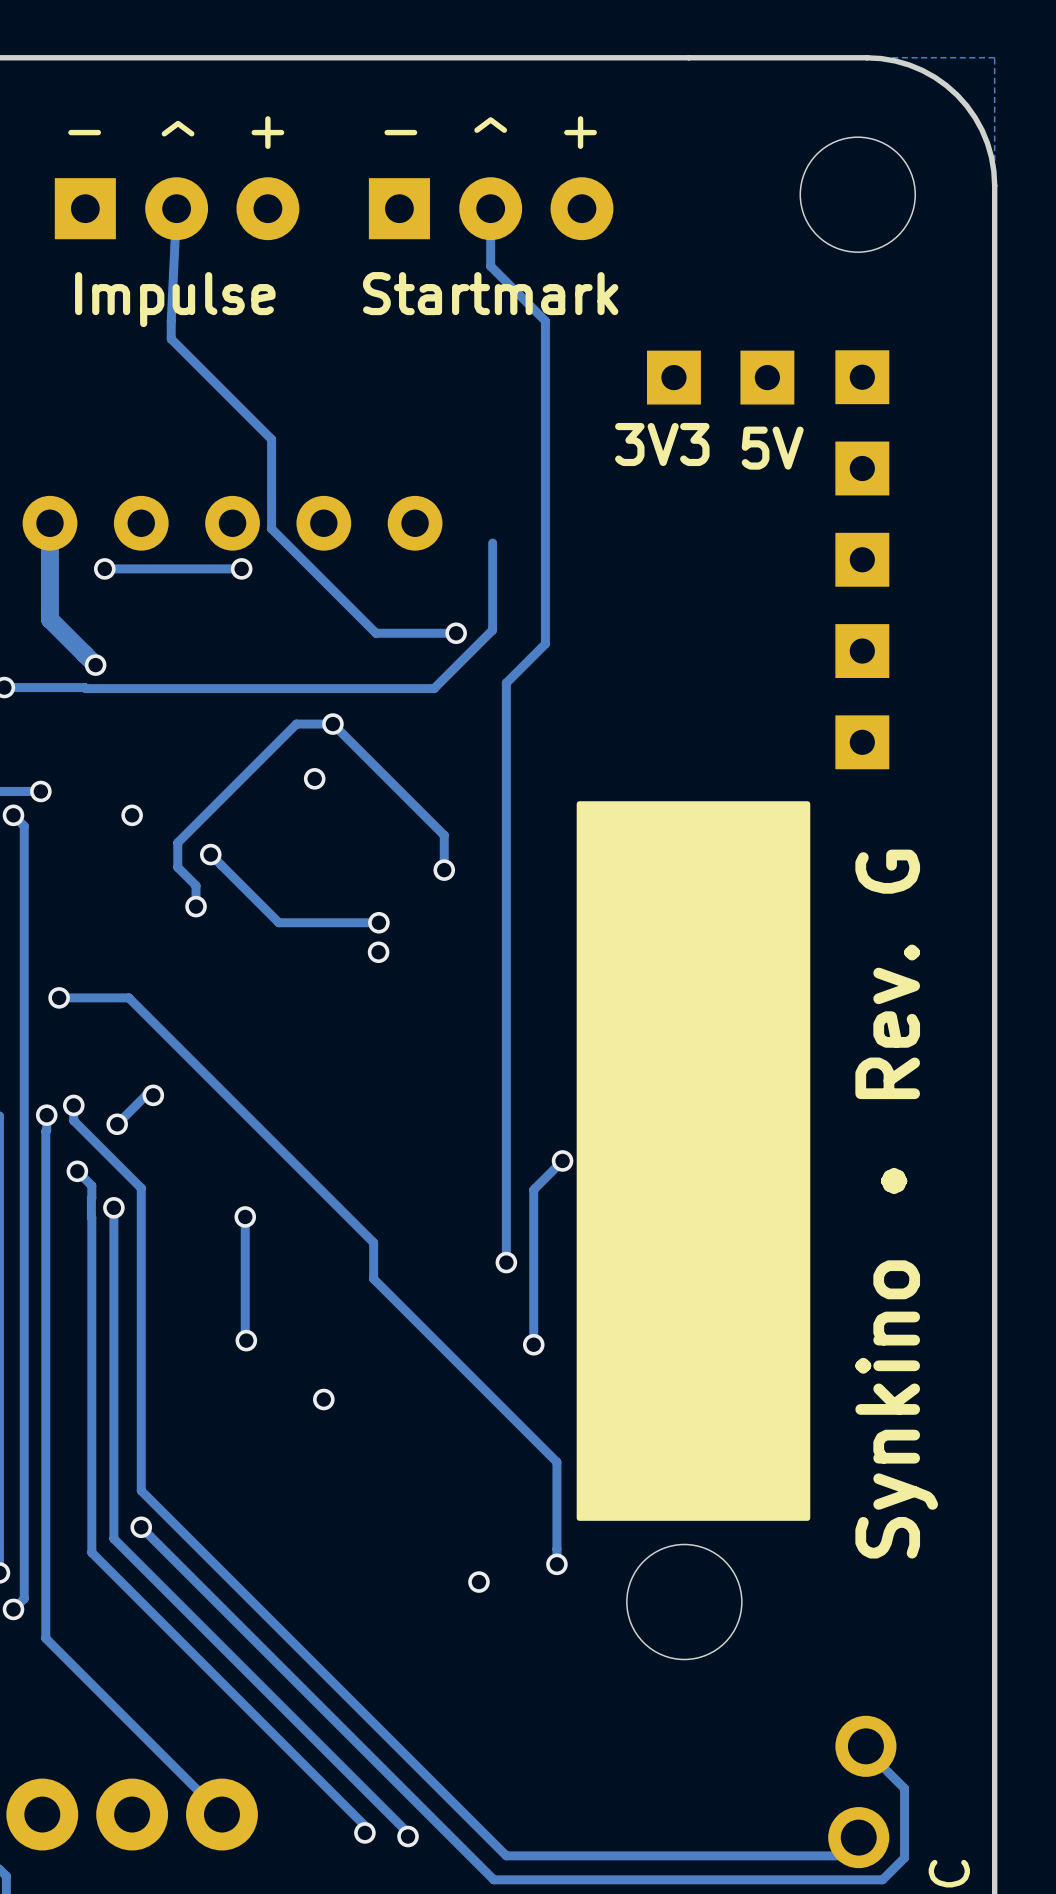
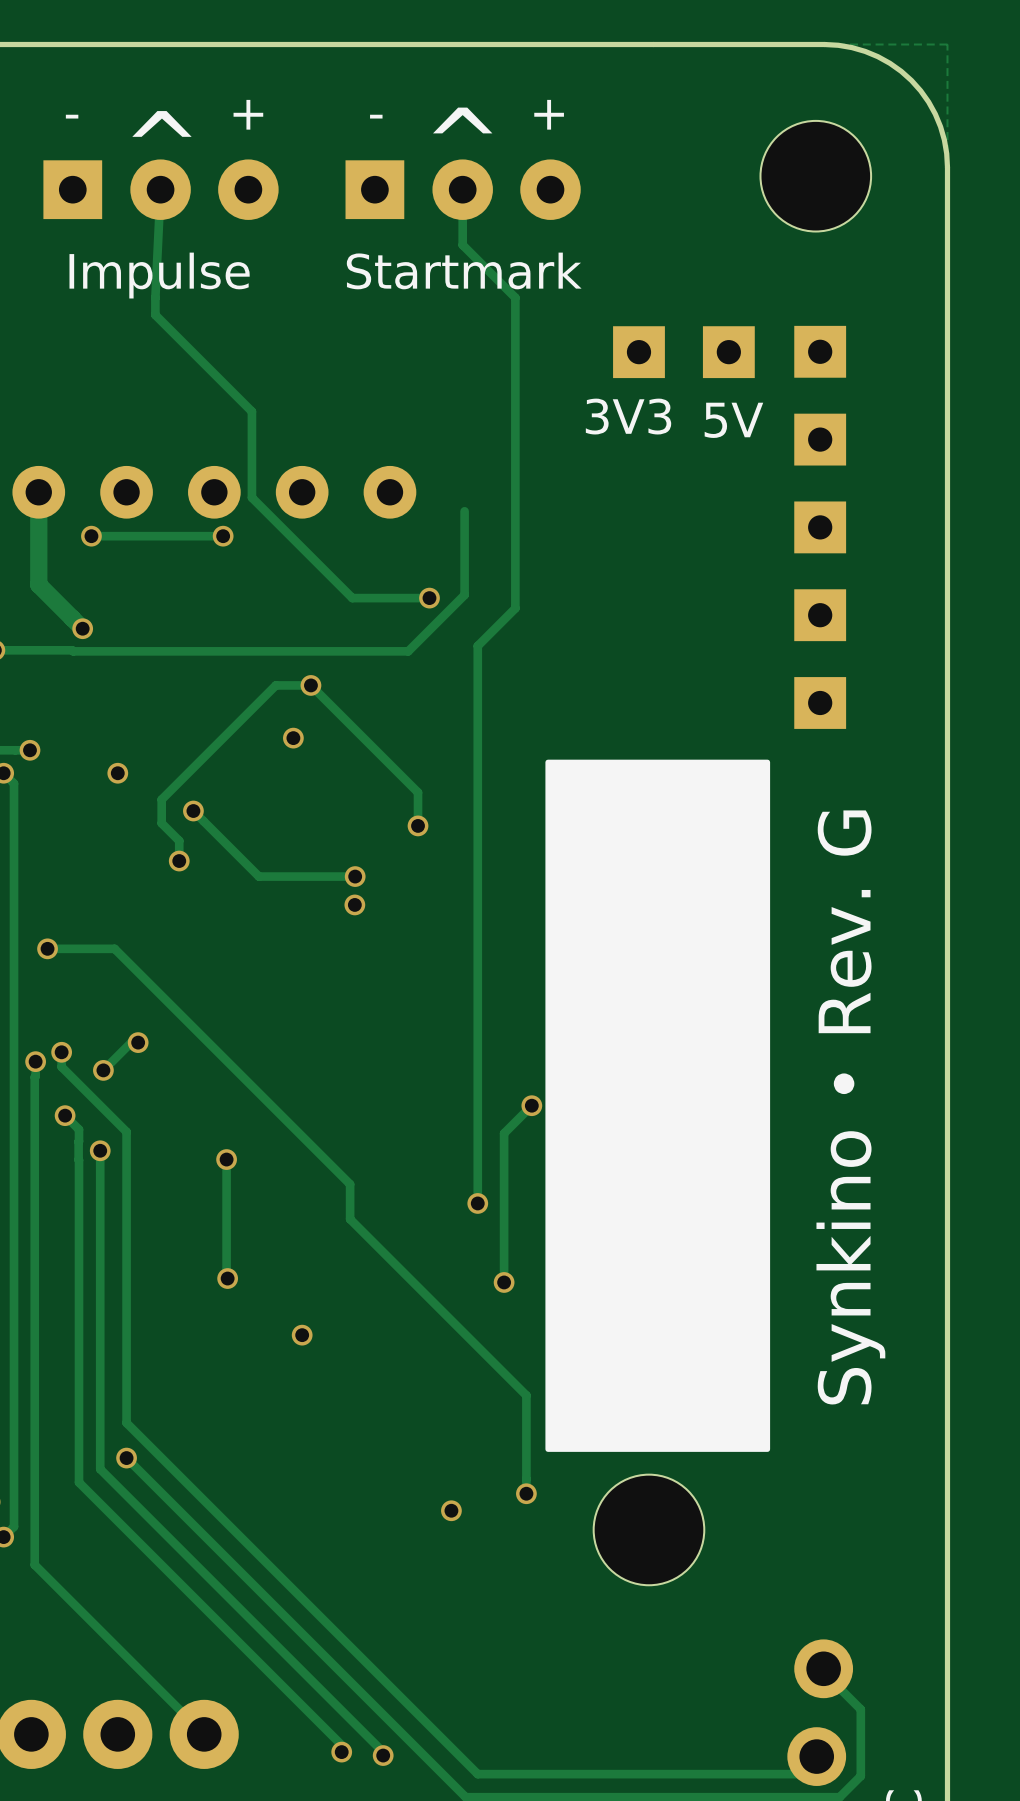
text position: Synkino • Rev. G (896, 1204) -> Synkino • Rev. G (850, 1107)

